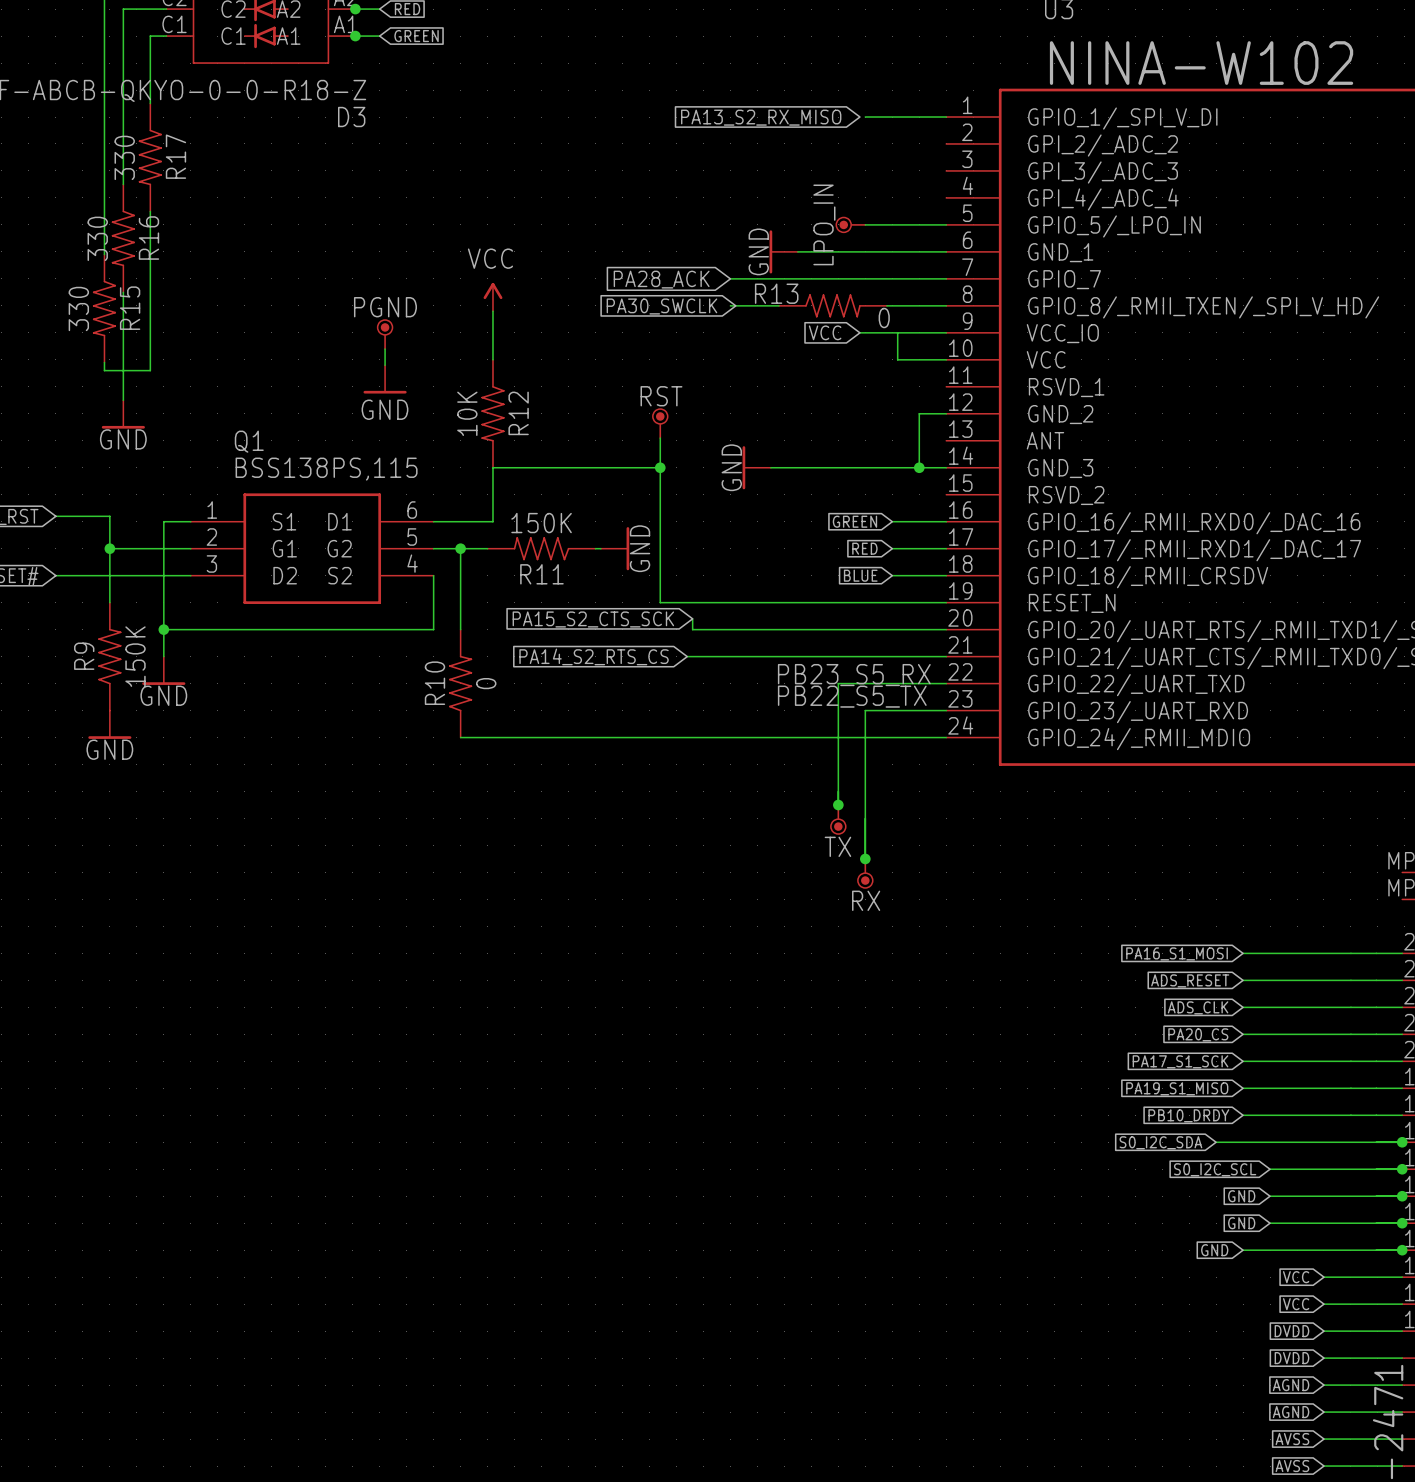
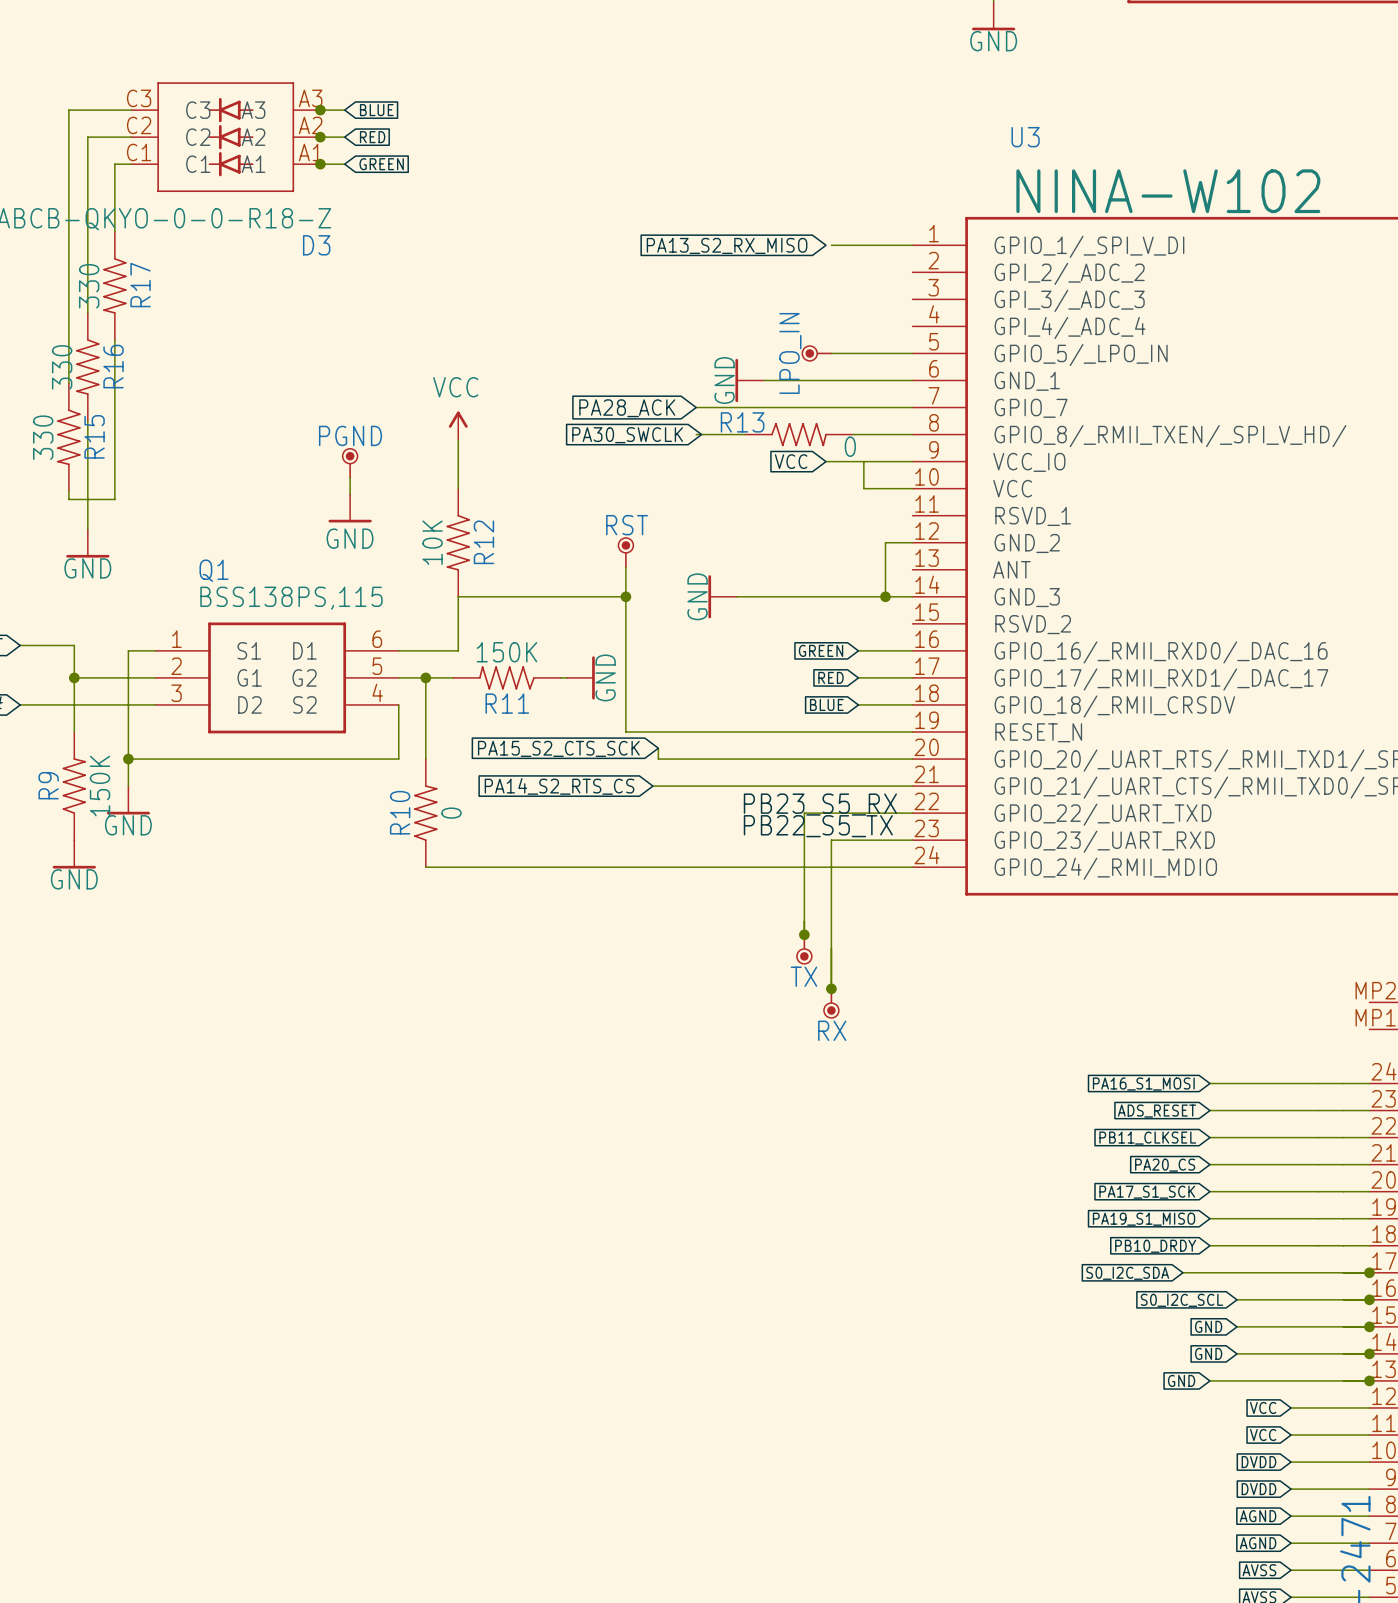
global label: ADS_CLK (1198, 1007) -> PB11_CLKSEL (1147, 1138)

